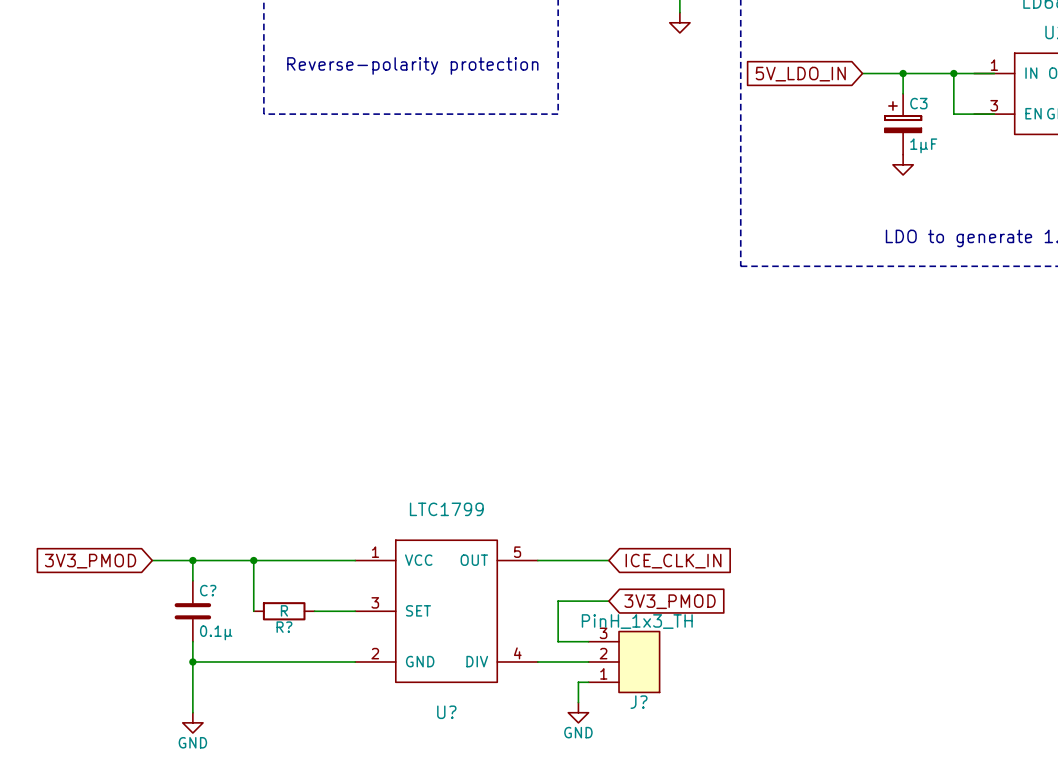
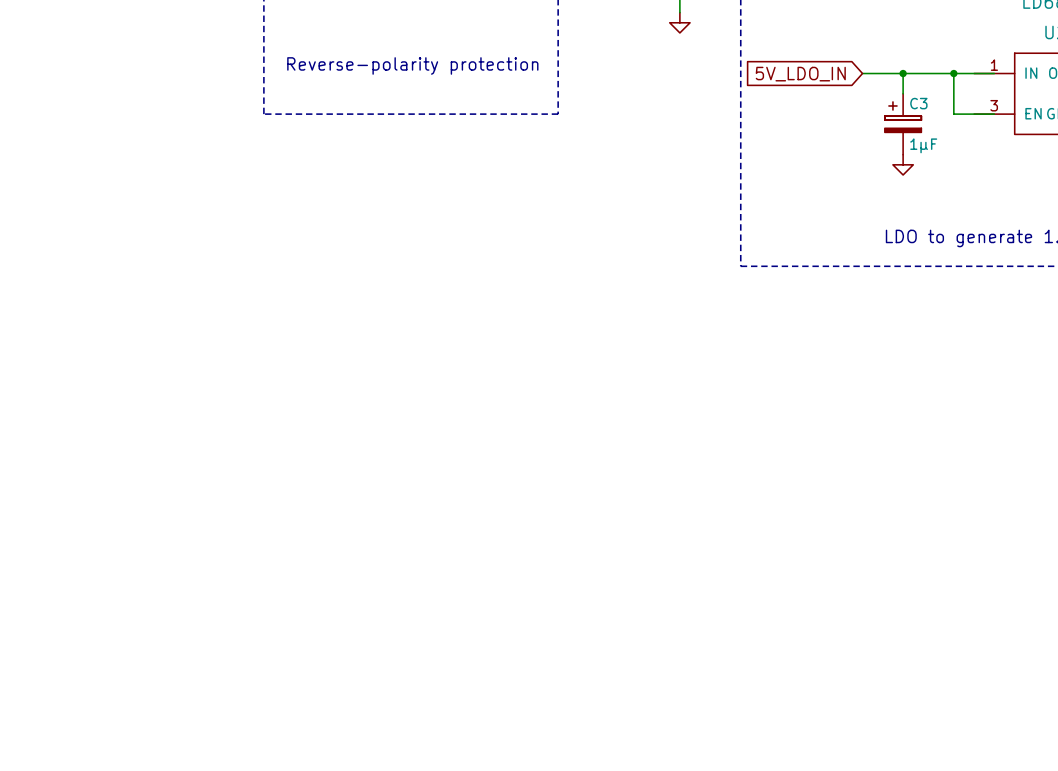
wire: (152, 560) (355, 560) -> none
wire: (192, 560) (192, 580) -> none
junction: (192, 560) -> none
wire: (253, 560) (253, 611) -> none
junction: (253, 560) -> none
wire: (537, 560) (608, 560) -> none
global label: 3V3_PMOD (90, 561) -> none
global label: ICE_CLK_IN (673, 561) -> none
wire: (608, 601) (558, 601) (558, 641) (588, 641) -> none
global label: 3V3_PMOD (670, 601) -> none
C?: 0.1µ (192, 611) -> none
R?: R (284, 611) -> none
wire: (314, 611) (355, 611) -> none
U?: LTC1799 (446, 611) -> none
wire: (192, 641) (192, 712) -> none
wire: (192, 661) (355, 661) -> none
junction: (192, 661) -> none
wire: (537, 661) (588, 661) -> none
J?: (624, 661) -> none
wire: (588, 682) (578, 682) (578, 702) -> none
power symbol: GND (578, 712) -> none
power symbol: GND (192, 722) -> none

